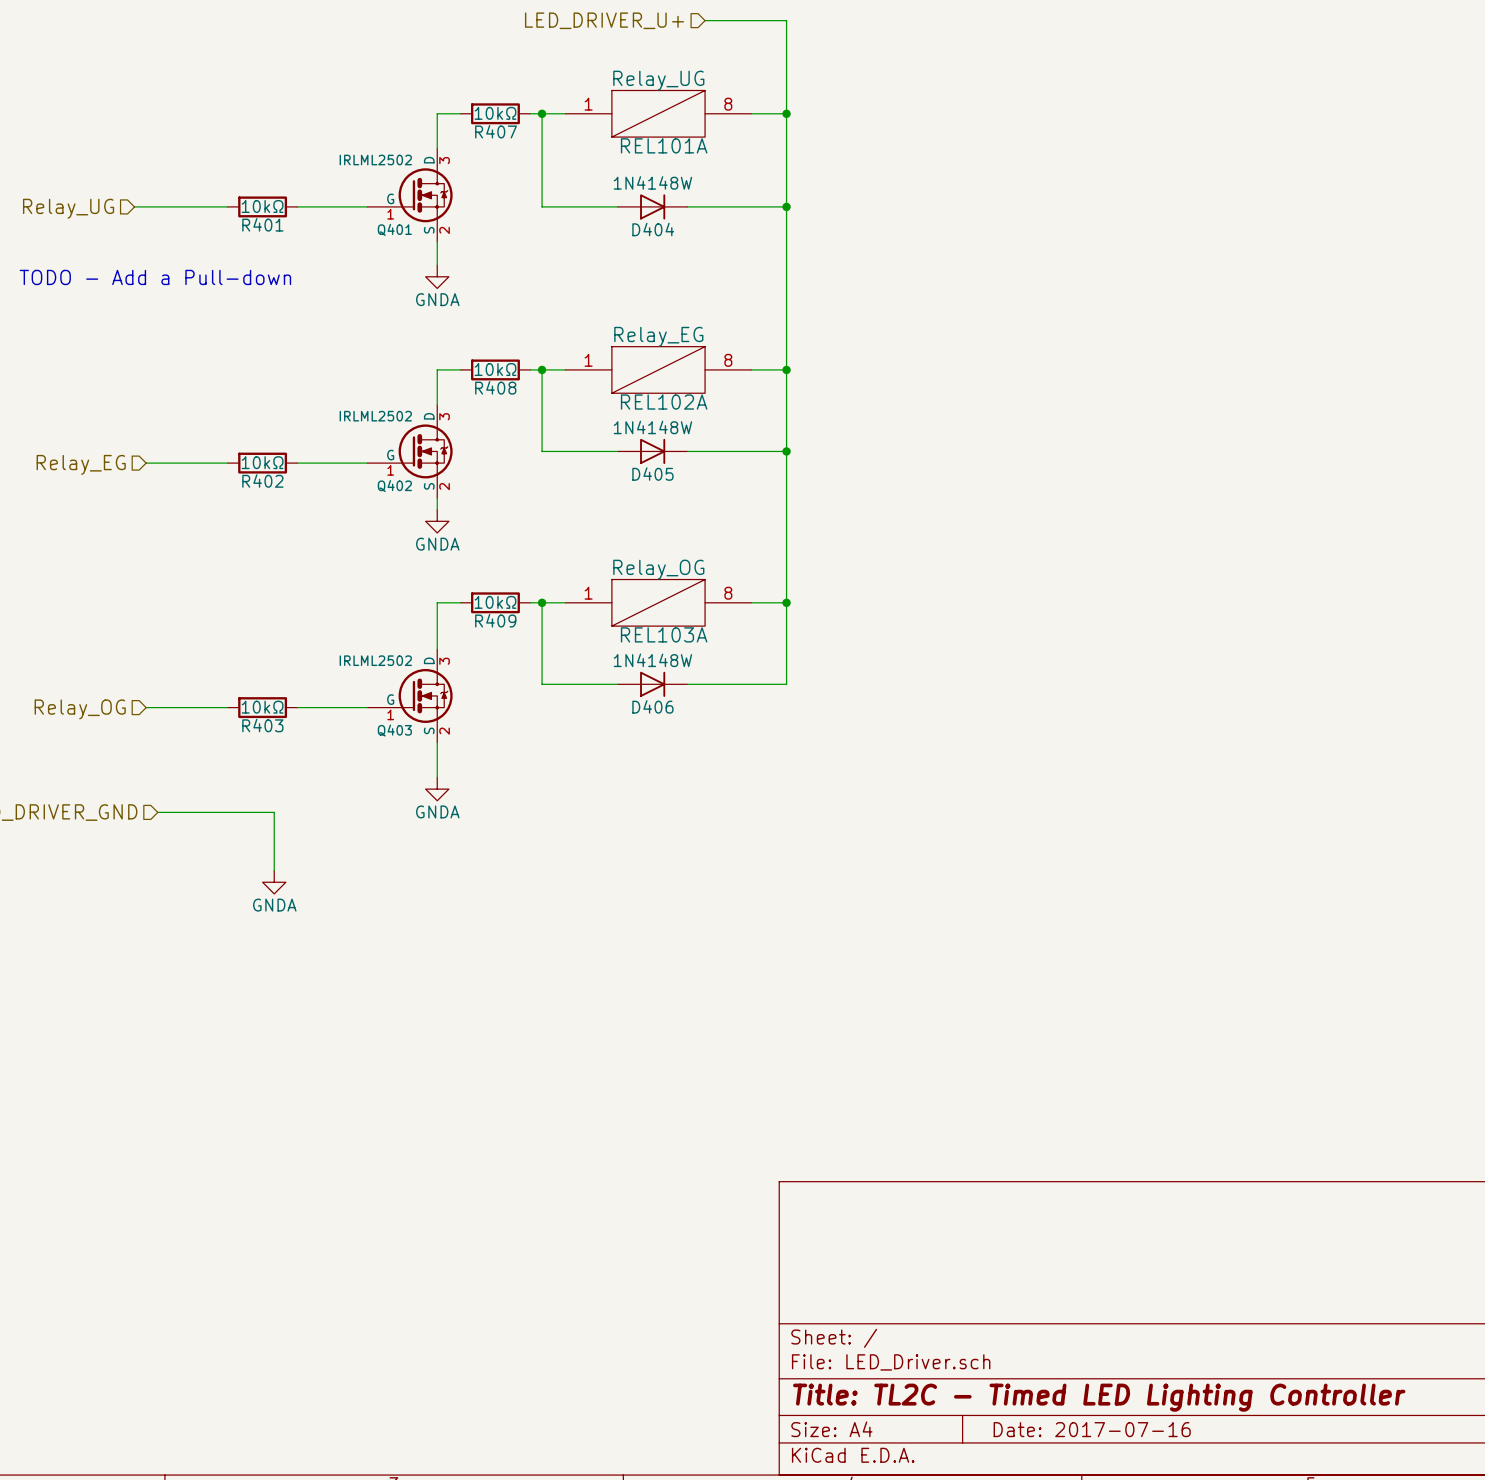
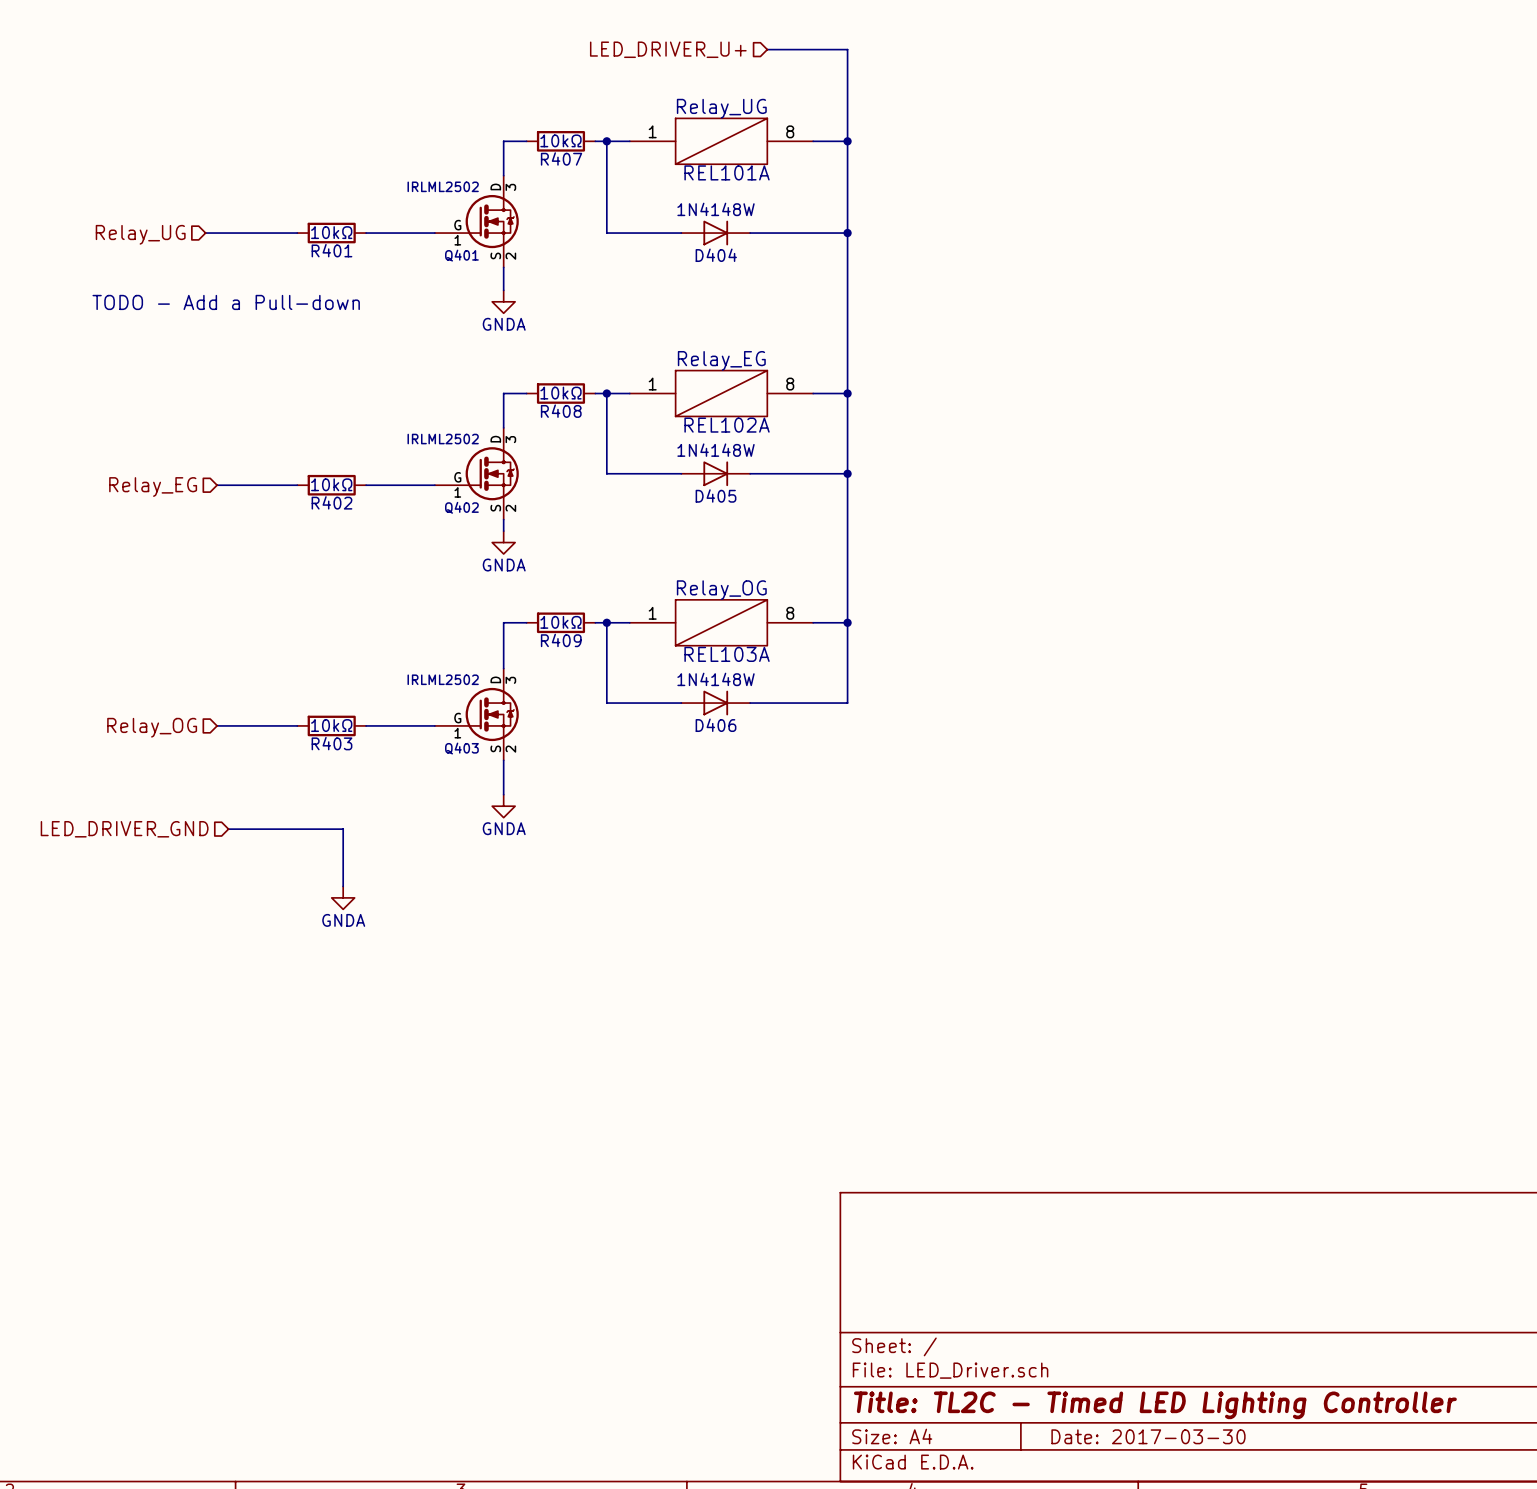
title block: Date: 2017-07-16 (1092, 1429) -> Date: 2017-03-30 (1148, 1436)

